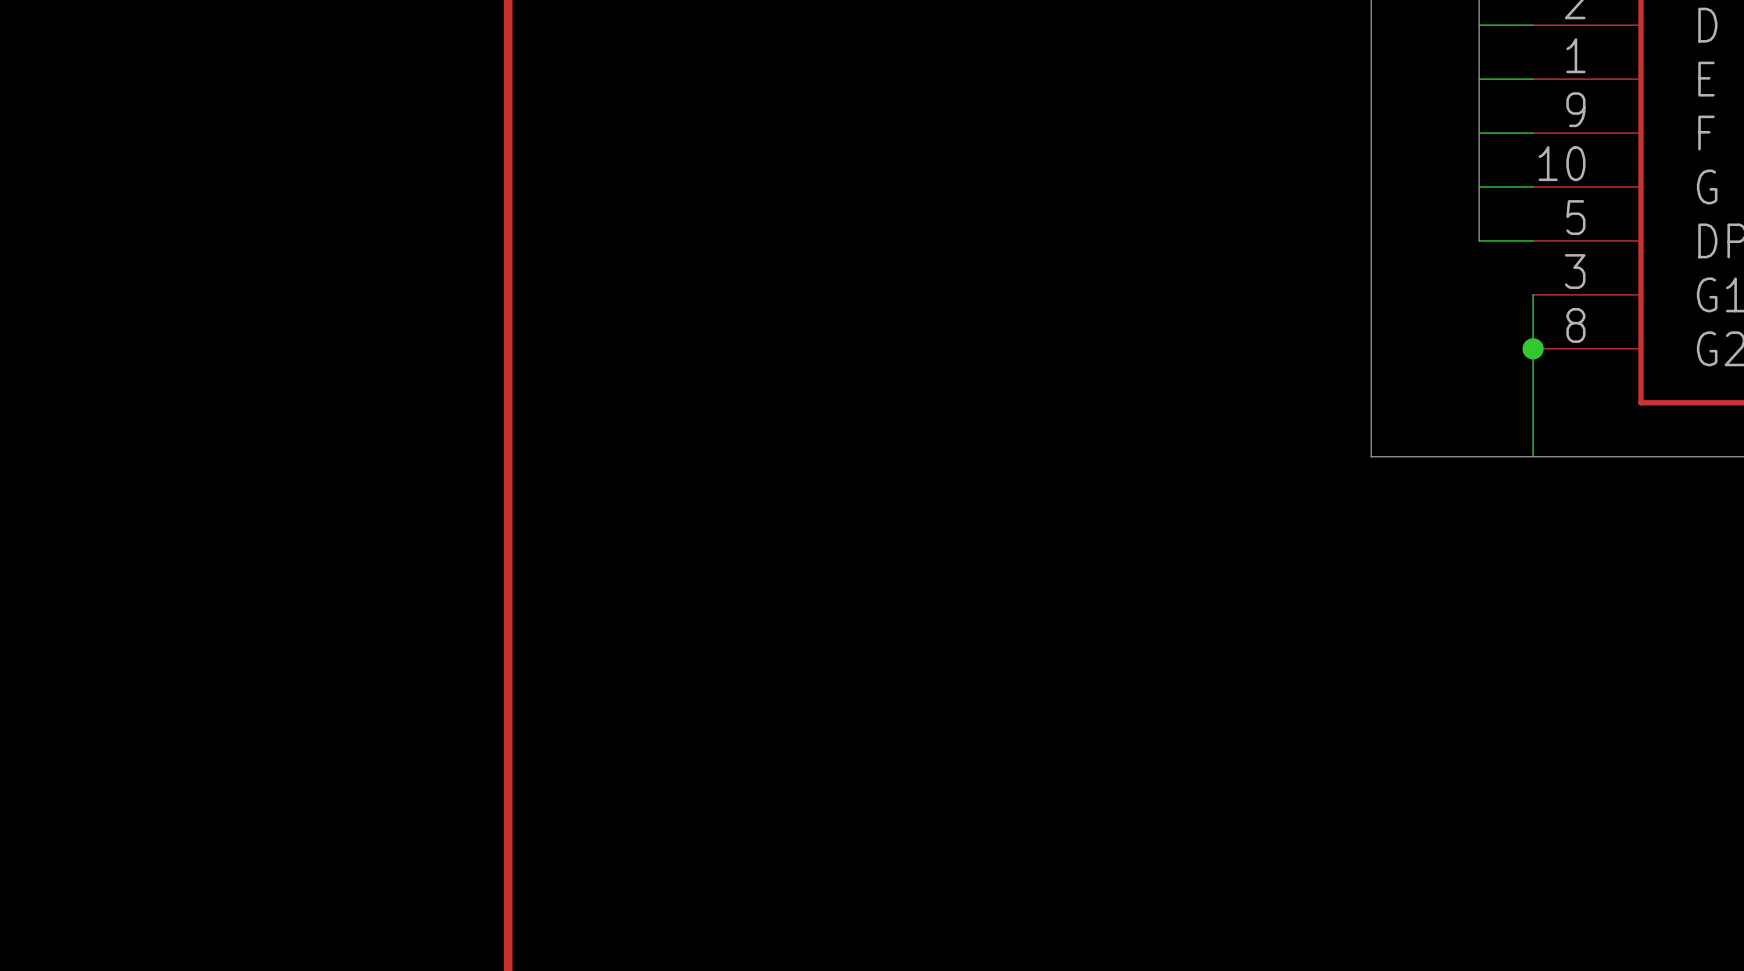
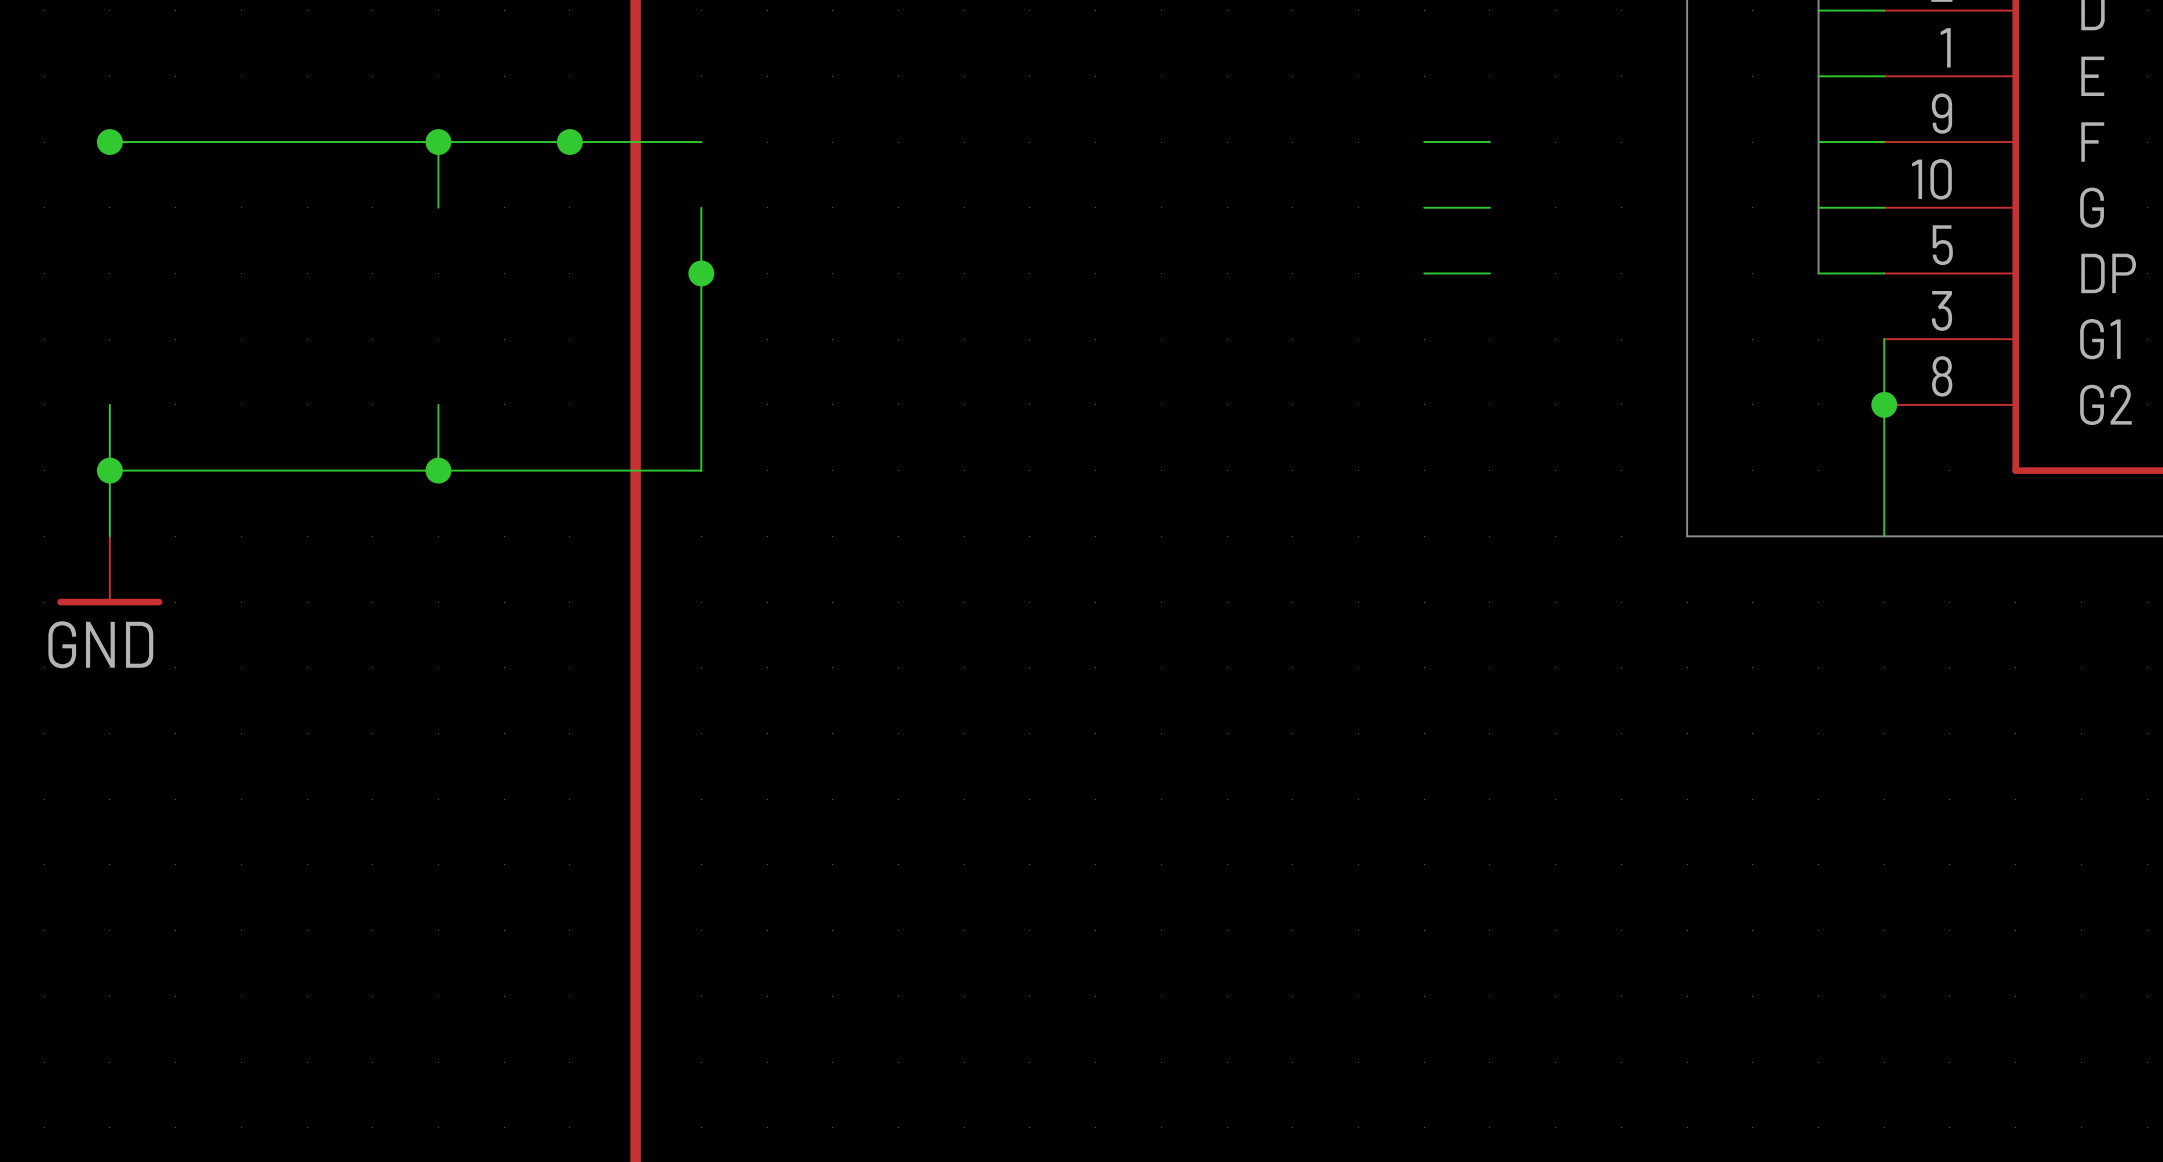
wire: none -> (109, 142) (701, 142)
junction: none -> (109, 142)
wire: none -> (438, 142) (438, 207)
junction: none -> (438, 142)
junction: none -> (569, 142)
wire: none -> (1424, 142) (1489, 142)
wire: none -> (701, 207) (701, 470) (109, 470)
wire: none -> (1424, 207) (1489, 207)
junction: none -> (701, 273)
wire: none -> (1424, 273) (1489, 273)
wire: none -> (109, 404) (109, 536)
wire: none -> (438, 404) (438, 470)
junction: none -> (109, 470)
junction: none -> (438, 470)
power symbol: none -> GND (109, 570)

